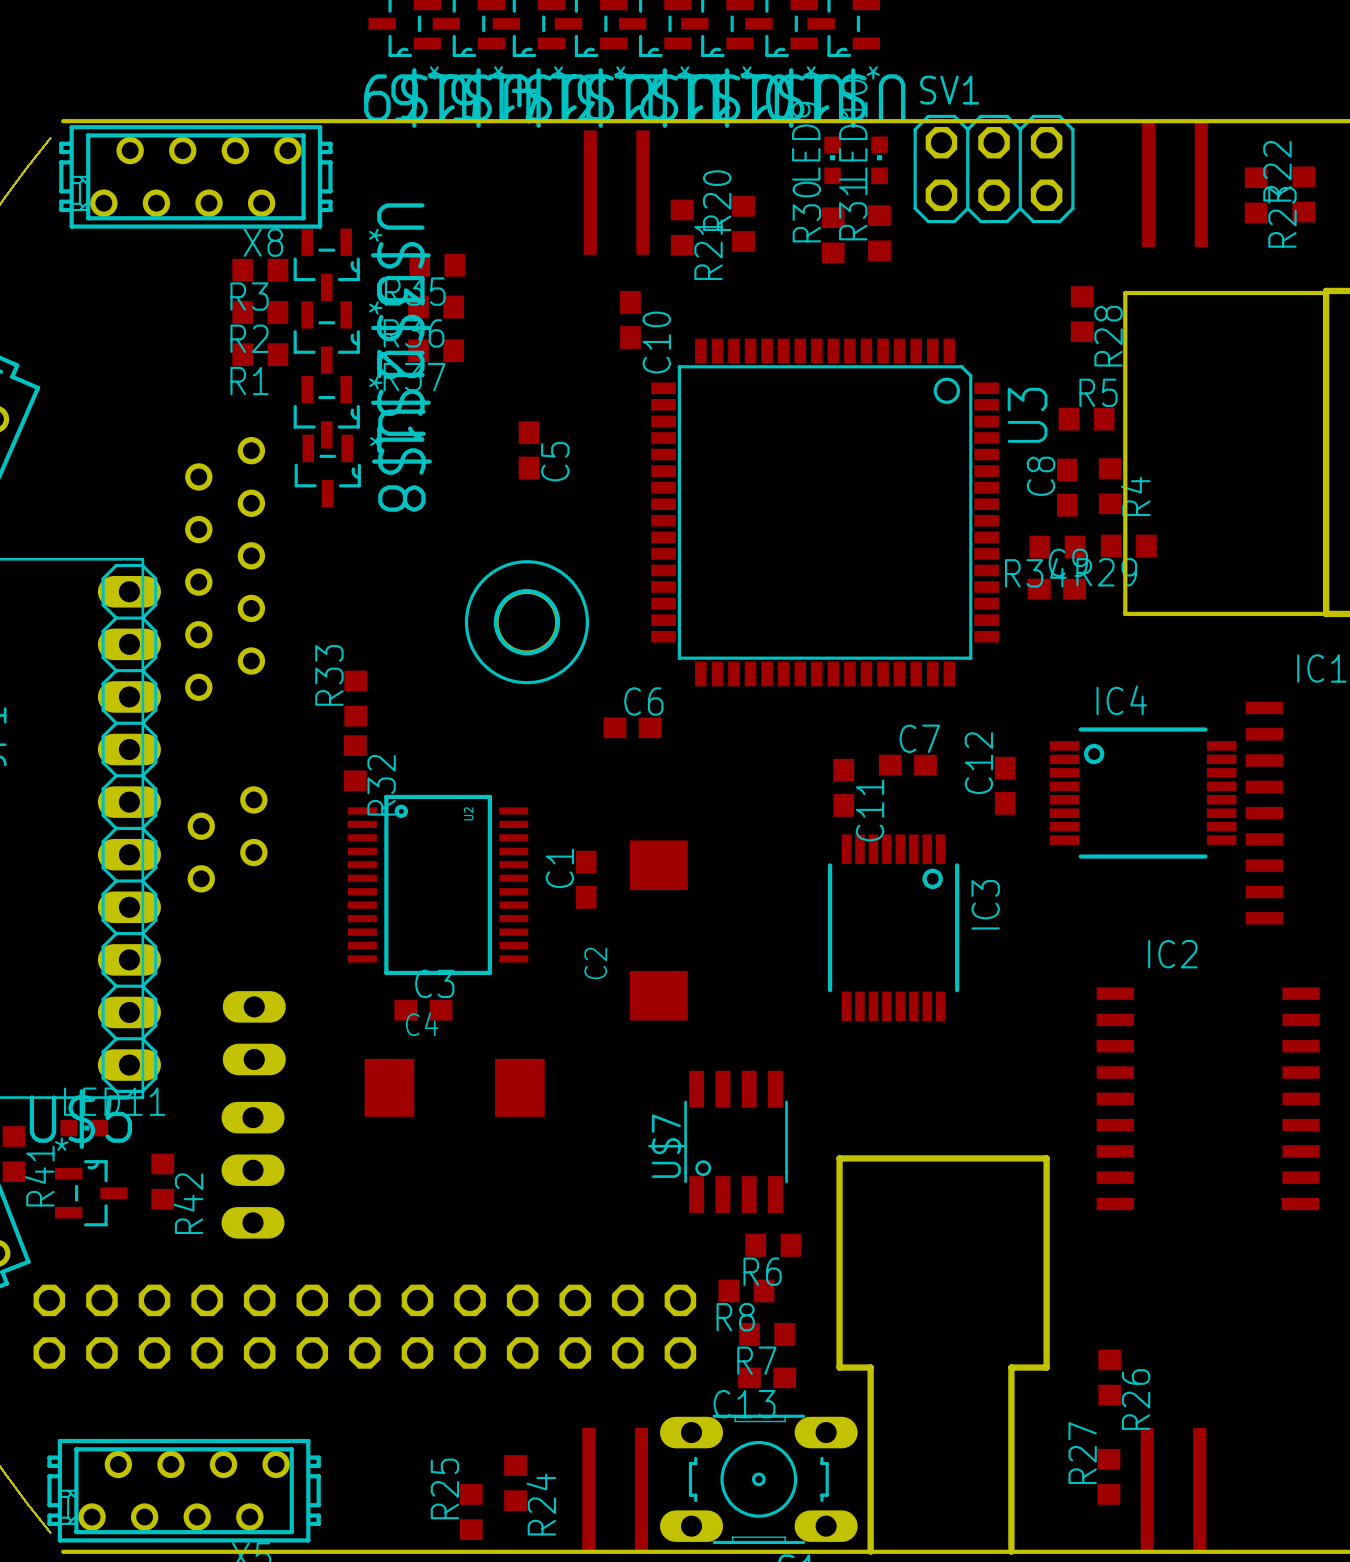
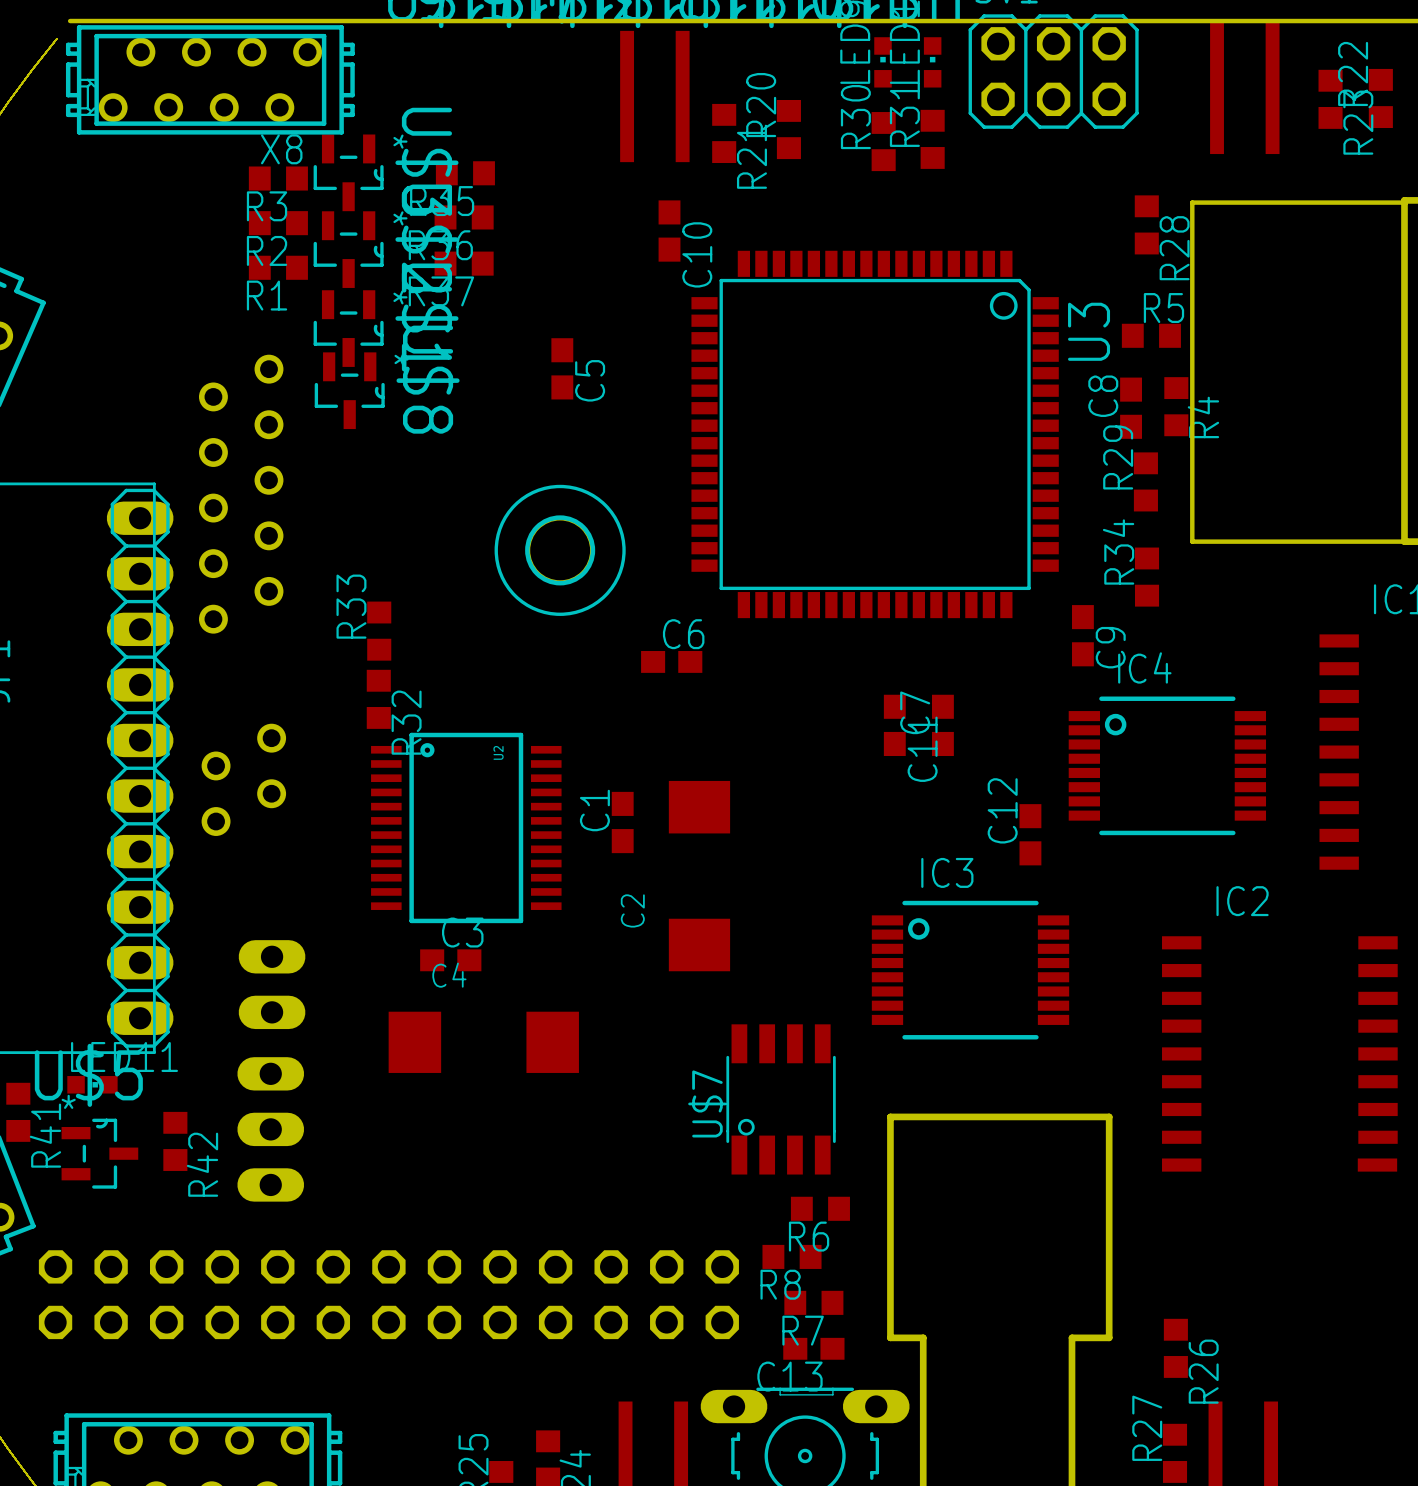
R29 rotation: 0° (1128, 546) -> 90° clockwise (1145, 481)
R29 position: (1128, 546) -> (1145, 481)
R34 rotation: 0° (1057, 547) -> 90° clockwise (1147, 577)
R34 position: (1057, 547) -> (1147, 577)
C9 rotation: 0° (1056, 589) -> 90° clockwise (1082, 635)
C9 position: (1056, 589) -> (1082, 635)
C7 name position: C7 (919, 738) -> C7 (915, 712)
C7 rotation: 0° (907, 765) -> 90° clockwise (942, 725)
C12 position: (1005, 785) -> (1030, 834)
IC4 position: (1143, 793) -> (1167, 765)
IC3 rotation: 0° (893, 927) -> 90° counterclockwise (970, 970)

